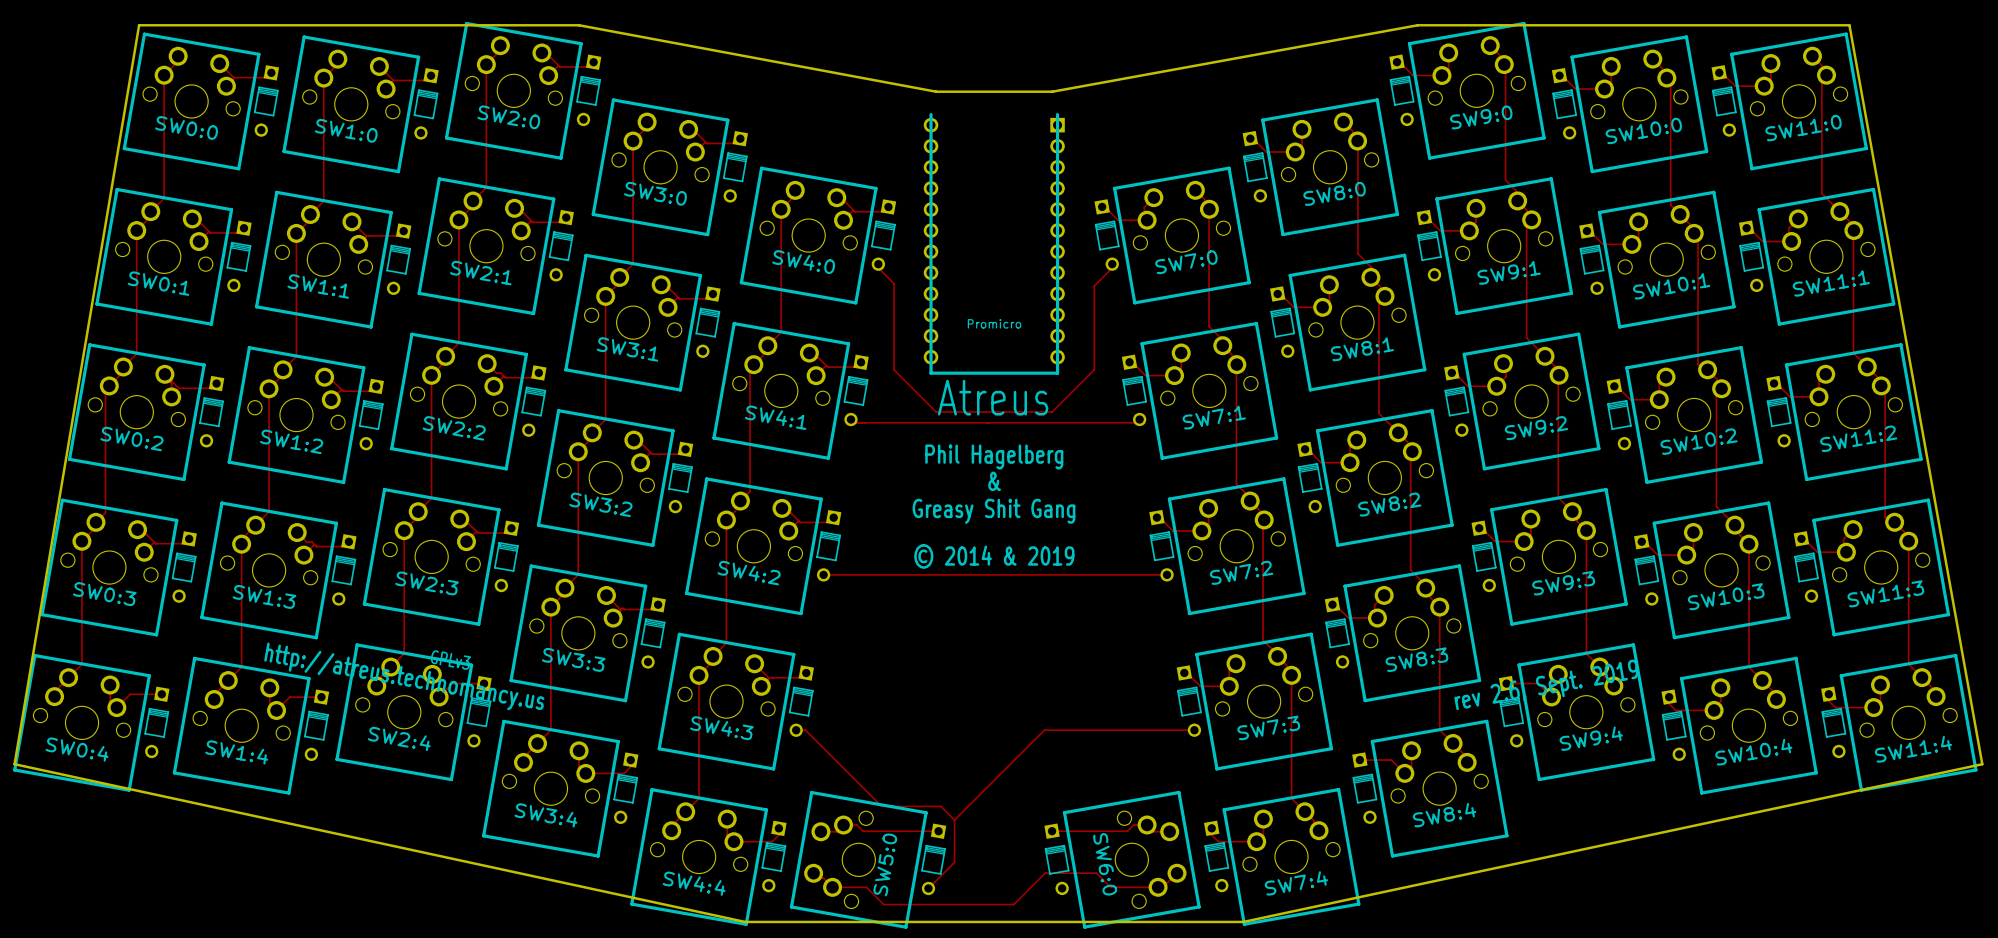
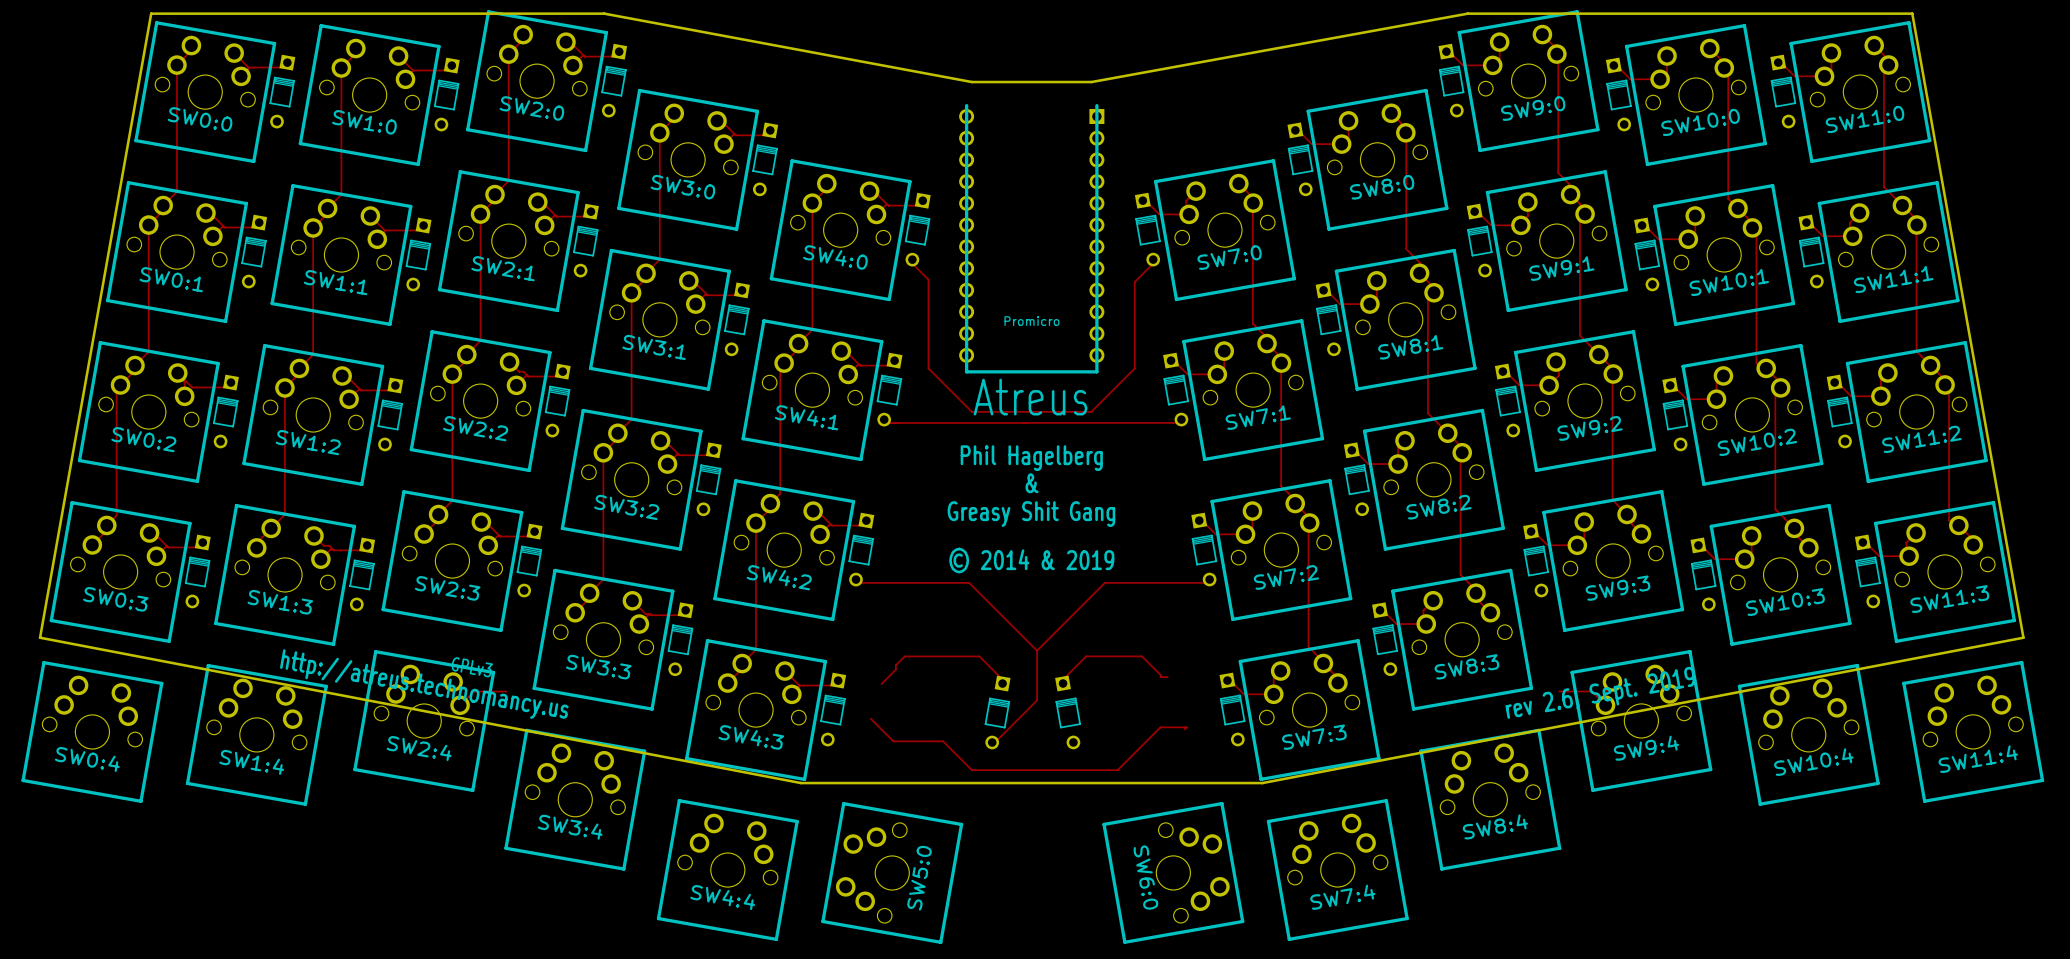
board edge: (139, 25) (14, 764) (745, 921) (1243, 921) (1982, 764) (1849, 25) -> (151, 13) (40, 637) (800, 783) (1262, 783) (2023, 637) (1912, 13)
track: (404, 530) (404, 653) (376, 681) (376, 686) -> none
track: (1586, 530) (1586, 653) (1599, 667) (1599, 671) (1613, 685) -> none
track: (81, 541) (81, 664) (54, 691) (54, 696) -> none
track: (1908, 541) (1908, 664) (1936, 691) (1936, 696) -> none
track: (241, 544) (241, 667) (214, 694) (214, 699) -> none
track: (1749, 544) (1749, 667) (1776, 694) (1776, 699) -> none
track: (823, 574) (1166, 574) -> none
track: none -> (855, 582) (969, 582) (1037, 650)
track: none -> (1210, 582) (1104, 582) (1037, 650)
track: (550, 607) (550, 730) (528, 753) (528, 757) (523, 762) -> none
track: (1439, 607) (1439, 730) (1467, 757) (1467, 762) -> none
track: none -> (1037, 650) (1037, 700) (991, 745)
track: none -> (1167, 677) (1160, 677) (1141, 656) (1086, 656) (1062, 680)
track: none -> (1003, 680) (979, 656) (904, 656) (895, 665) (895, 669) (881, 684)
track: (699, 675) (699, 798) (671, 825) (671, 830) -> none
track: (1291, 675) (1291, 798) (1314, 821) (1314, 826) (1318, 830) -> none
track: (1880, 684) (1880, 700) (1873, 707) (1835, 707) (1828, 700) (1828, 694) -> none
track: (110, 685) (110, 700) (116, 707) (130, 694) (161, 694) -> none
track: (269, 687) (269, 703) (276, 710) (289, 697) (321, 697) -> none
track: (1720, 687) (1720, 701) (1714, 710) (1675, 710) (1669, 703) (1669, 697) -> none
part: none -> (997, 712)
part: none -> (1068, 712)
track: none -> (870, 718) (893, 741) (943, 741) (971, 770) (1117, 770) (1160, 727) (1186, 727) (1184, 729)
part: (479, 711) -> none
part: (1511, 711) -> none
part: (156, 722) -> none
part: (1833, 722) -> none
part: (316, 725) -> none
part: (1674, 725) -> none
track: (796, 730) (805, 730) (881, 806) (940, 806) (954, 820) -> none
track: (1194, 730) (1044, 730) (954, 820) -> none
track: (579, 750) (579, 766) (585, 773) (624, 773) (630, 766) (630, 760) -> none
track: (1411, 750) (1411, 766) (1404, 773) (1391, 760) (1359, 760) -> none
part: (625, 788) -> none
part: (1364, 788) -> none
track: (727, 819) (727, 834) (733, 841) (772, 841) (778, 835) (778, 828) -> none
track: (1263, 819) (1263, 834) (1256, 841) (1218, 841) (1211, 835) (1211, 828) -> none
track: (954, 820) (954, 862) (928, 888) -> none
track: (938, 831) (863, 831) (856, 825) (843, 825) (836, 831) (820, 831) -> none
track: (1052, 831) (1127, 831) (1133, 824) (1147, 824) (1153, 831) (1169, 831) -> none
part: (774, 856) -> none
part: (1216, 856) -> none
part: (933, 859) -> none
part: (1056, 859) -> none
track: (1177, 873) (1167, 882) (1162, 882) (1158, 887) (1110, 887) (1096, 873) (1045, 873) (1013, 904) (883, 904) (866, 887) (832, 887) (823, 877) (818, 877) (813, 873) -> none

